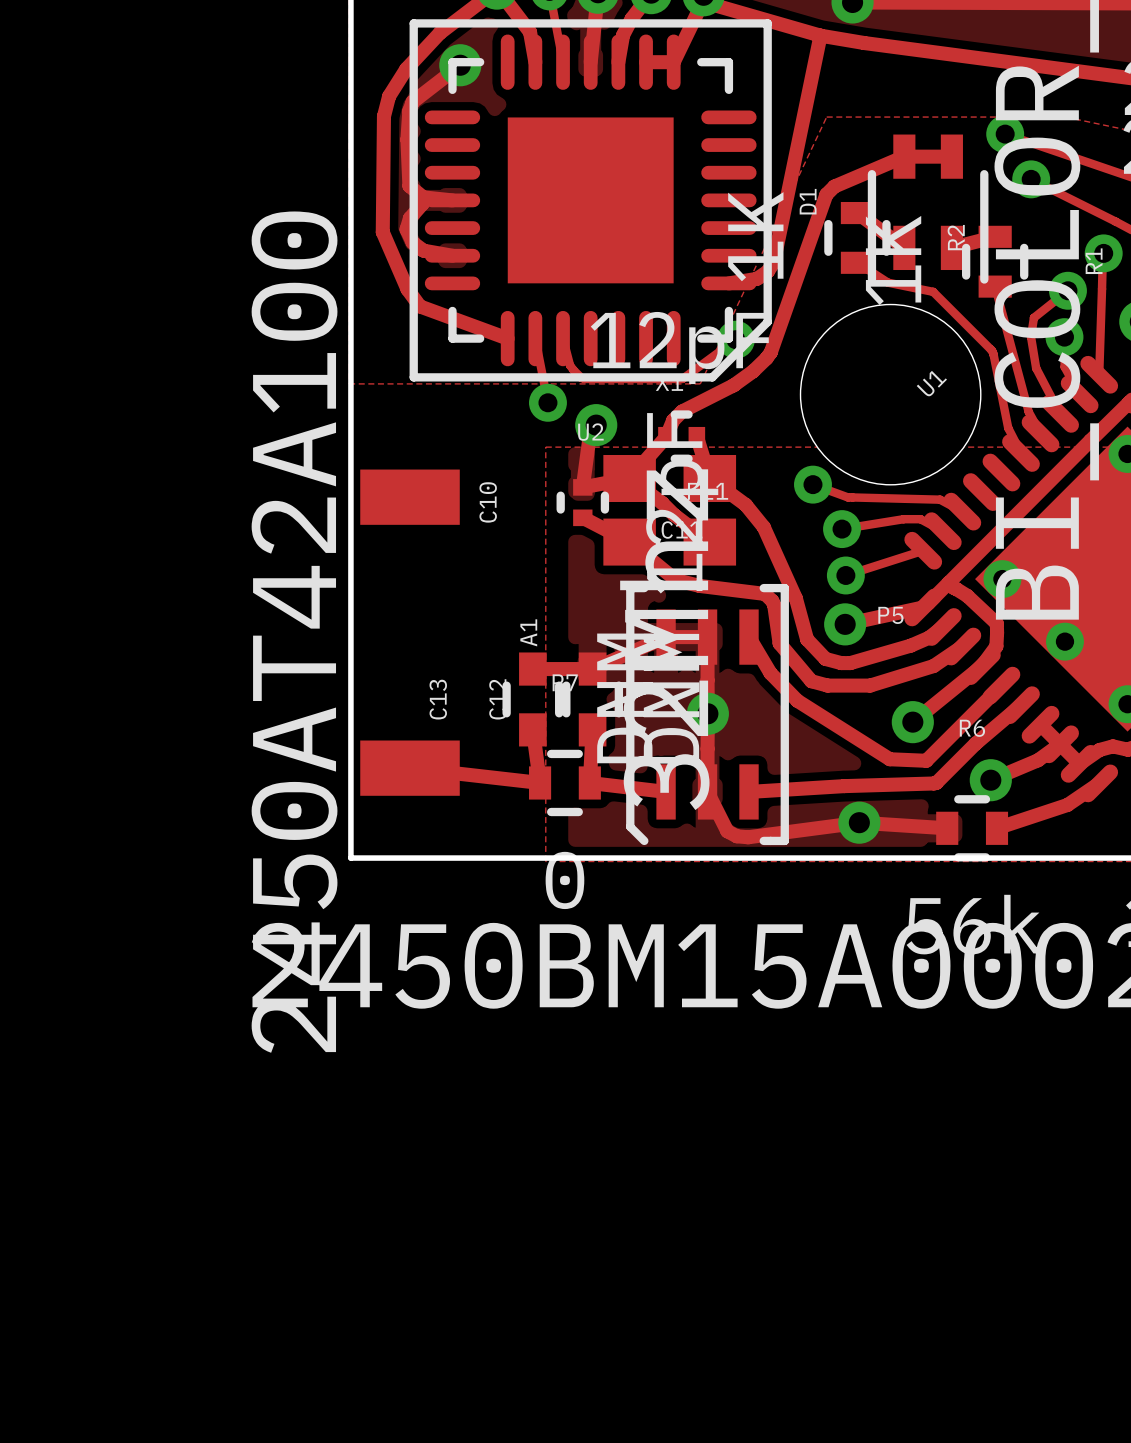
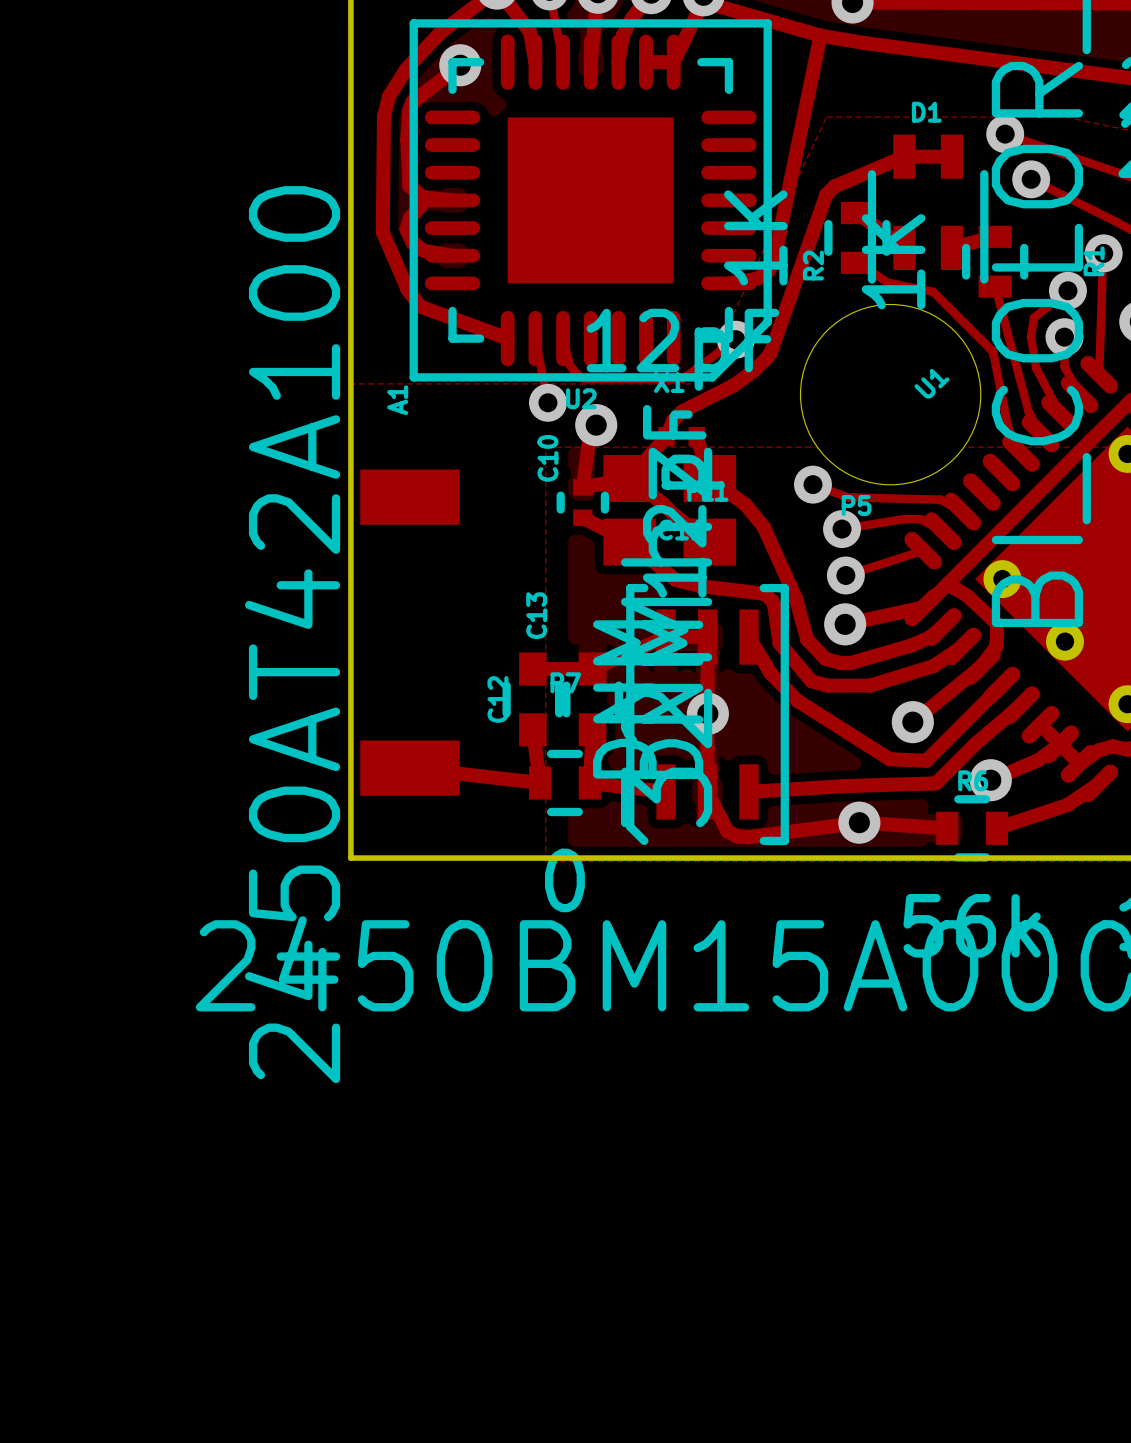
D1 name rotation: 0° (808, 201) -> 90° clockwise (926, 112)
D1 name position: D1 (808, 201) -> D1 (926, 112)
R2 name position: R2 (956, 237) -> R2 (813, 265)
U2 name position: U2 (590, 432) -> U2 (581, 398)
C10 name position: C10 (488, 502) -> C10 (547, 458)
P5 name position: P5 (890, 615) -> P5 (856, 505)
A1 name position: A1 (528, 632) -> A1 (397, 400)
C13 name position: C13 (438, 699) -> C13 (536, 615)
R6 name position: R6 (972, 728) -> R6 (973, 780)

